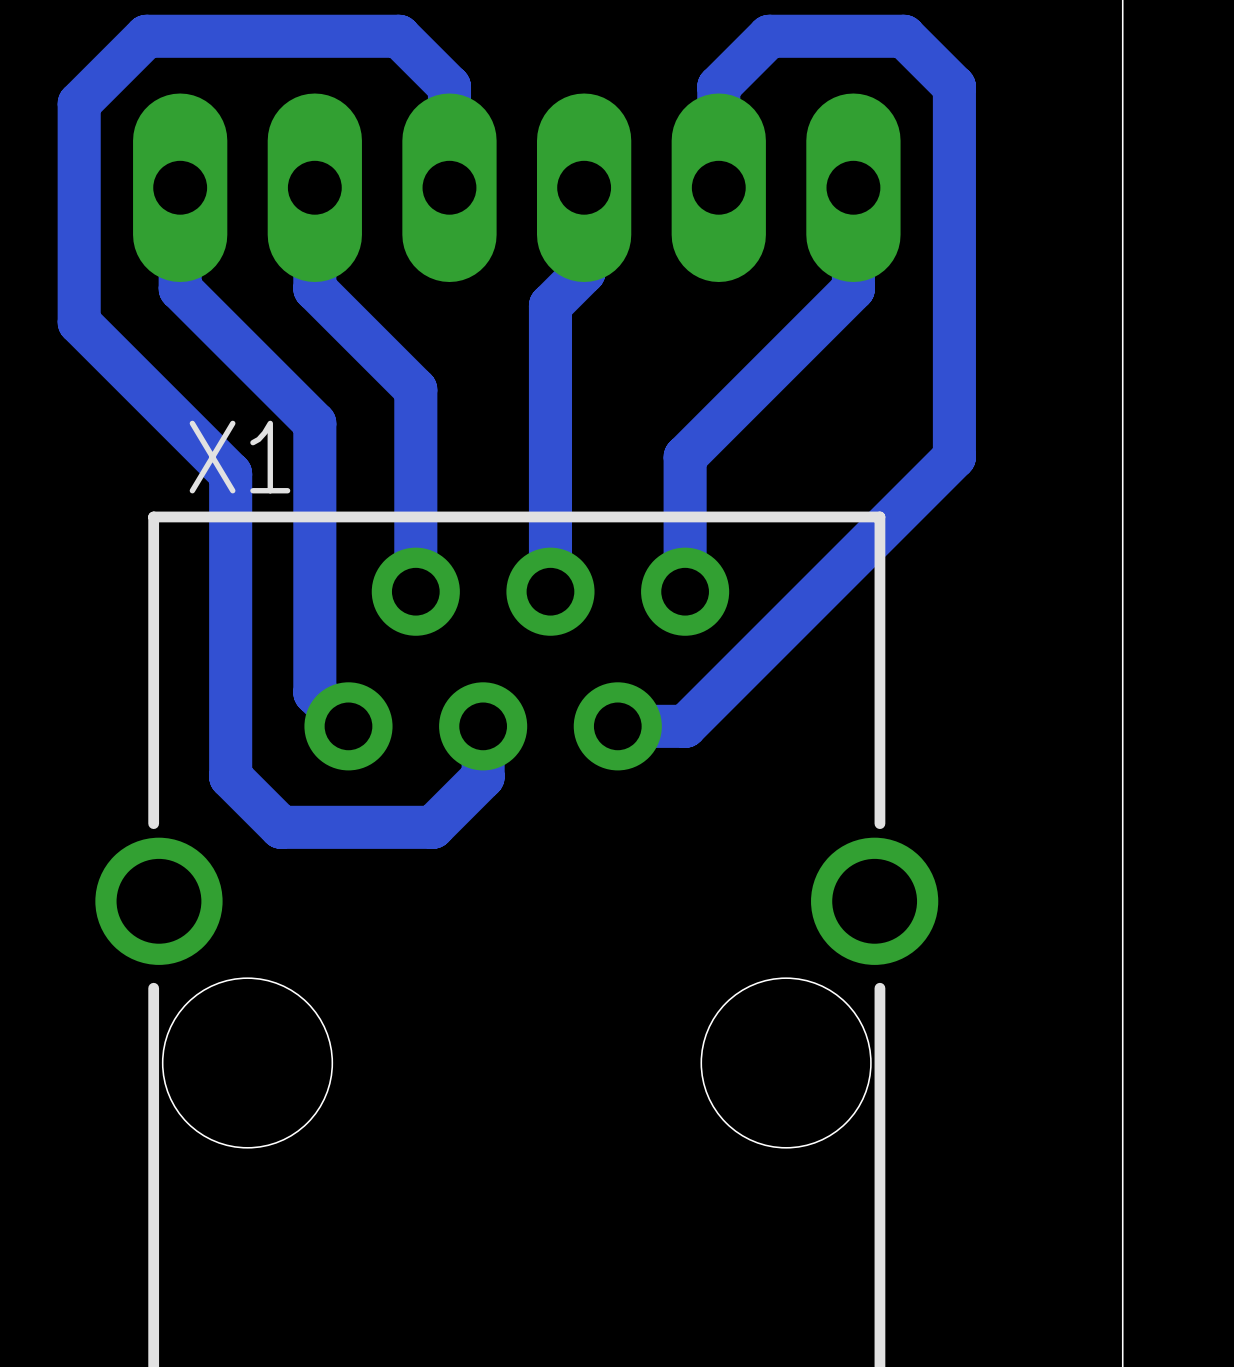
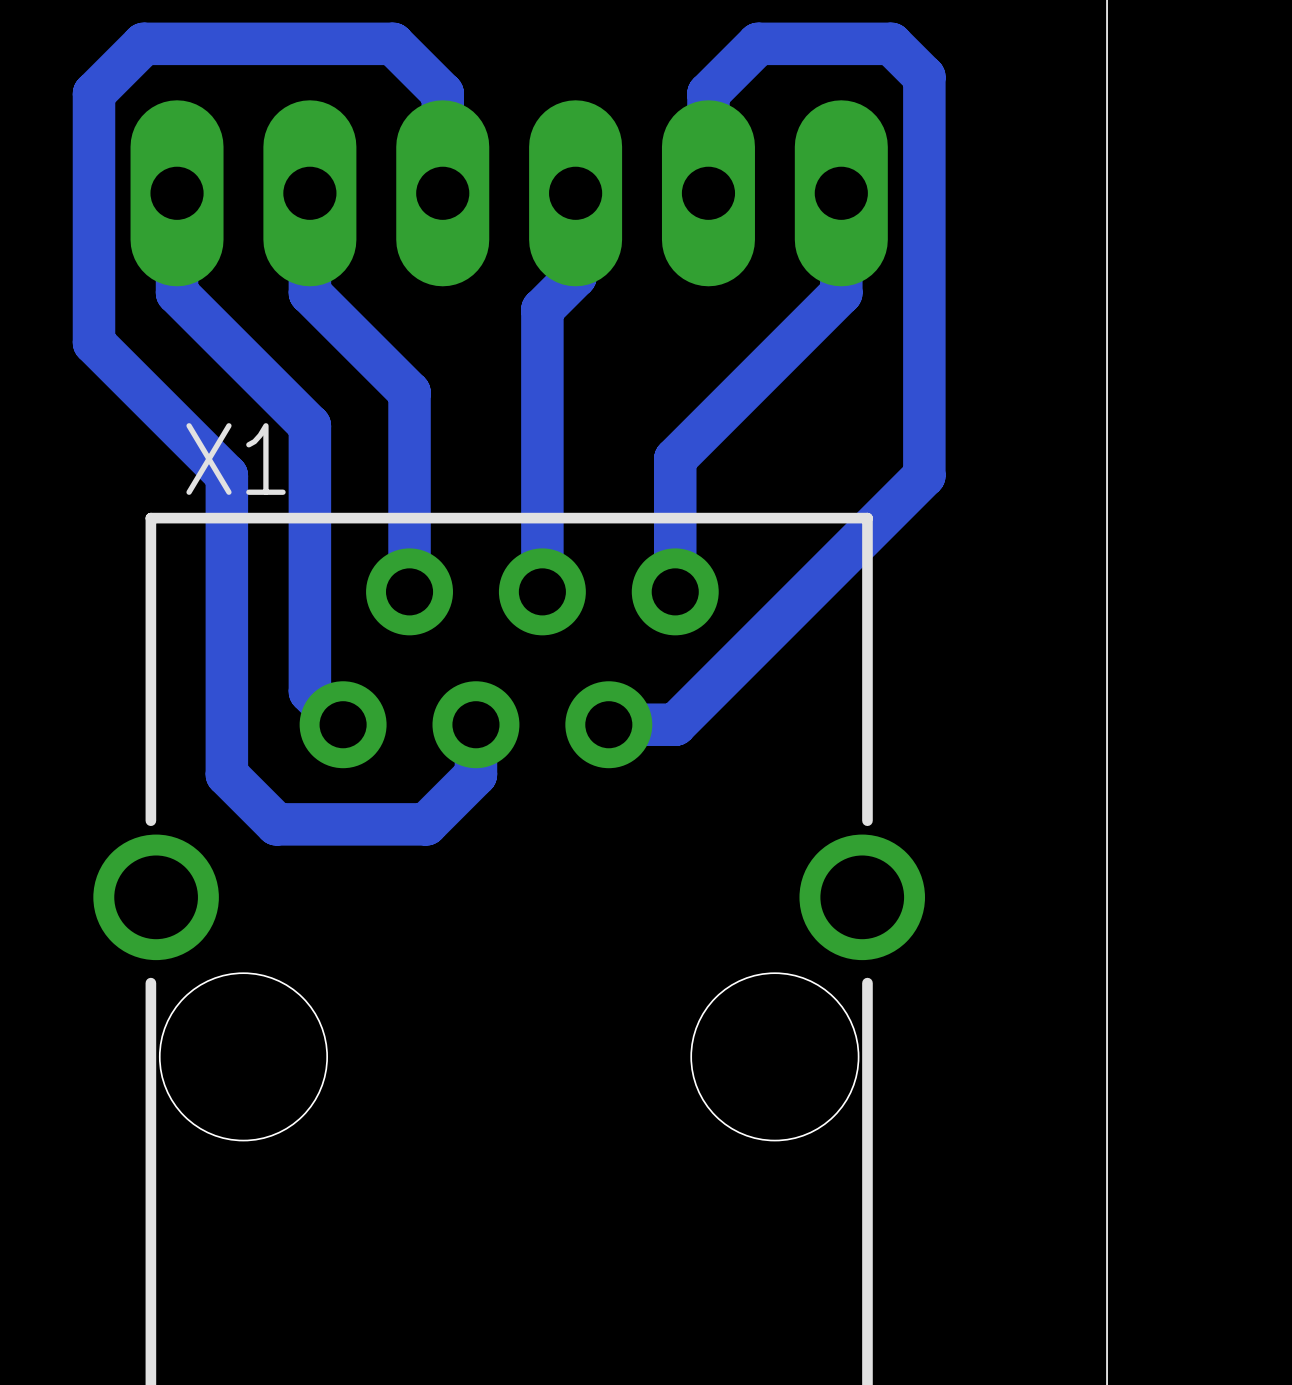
bottom track: (937, 69) (954, 86) (954, 457) (937, 473) -> (924, 77) (924, 475)
bottom track: (96, 86) (79, 103) (79, 322) (96, 339) -> (94, 93) (94, 342)

